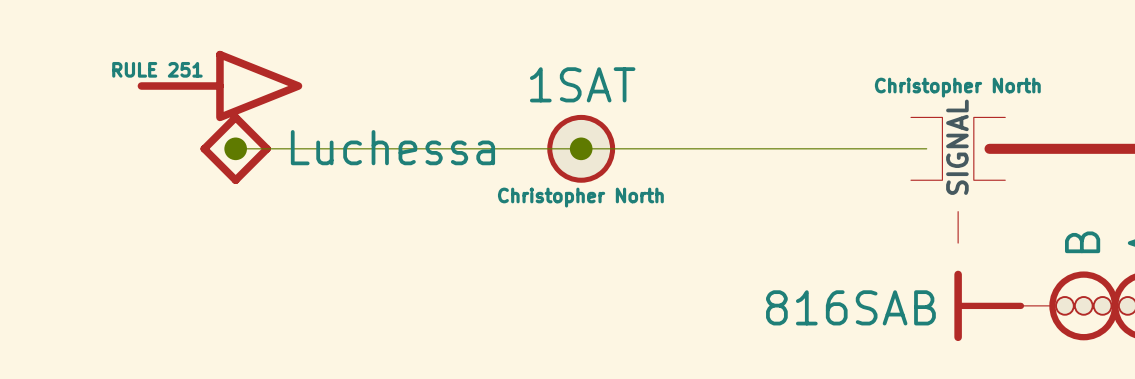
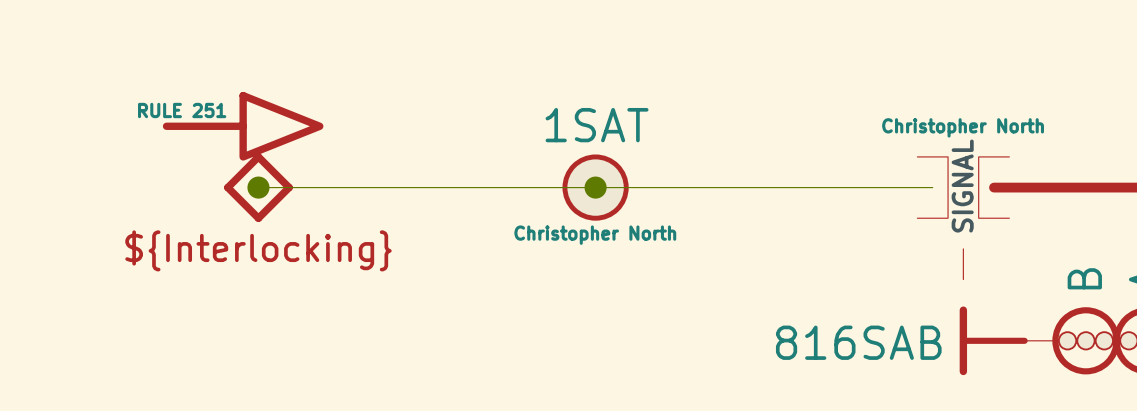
part value: Luchessa (392, 147) -> none
part text: none -> ${Interlocking} (258, 250)

